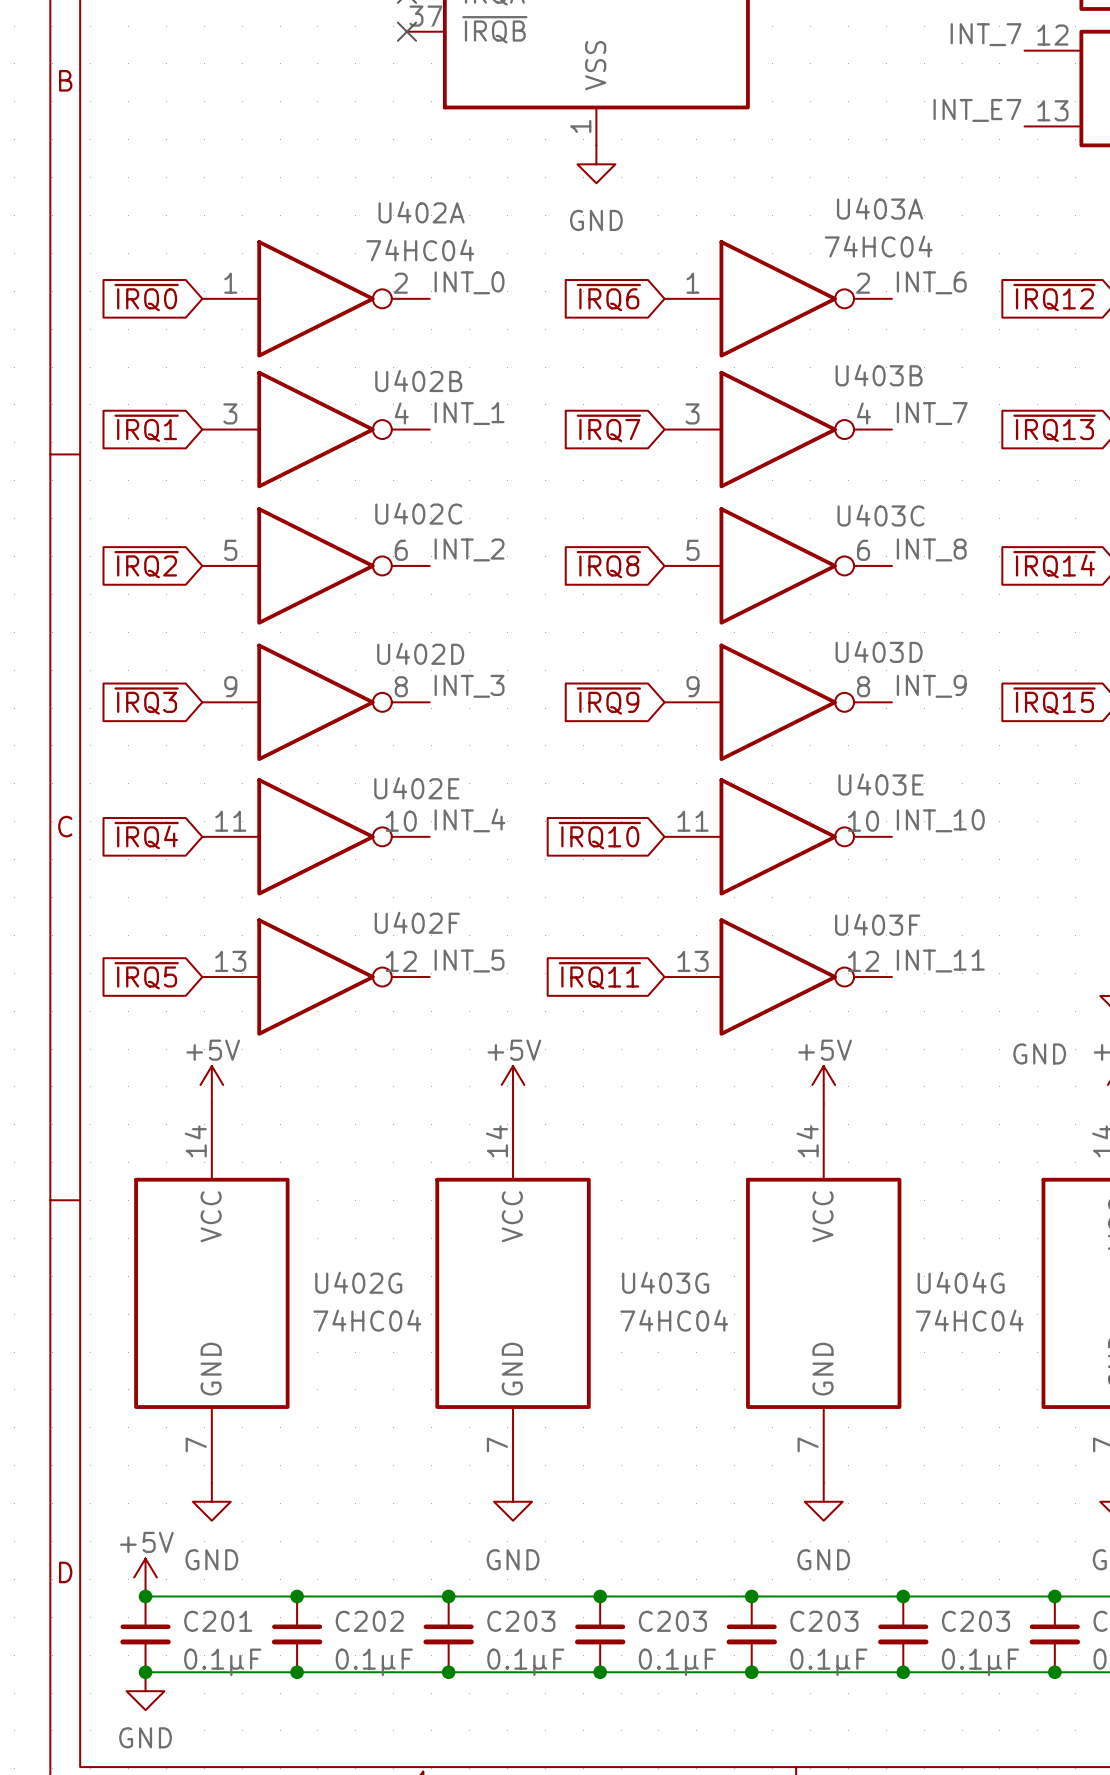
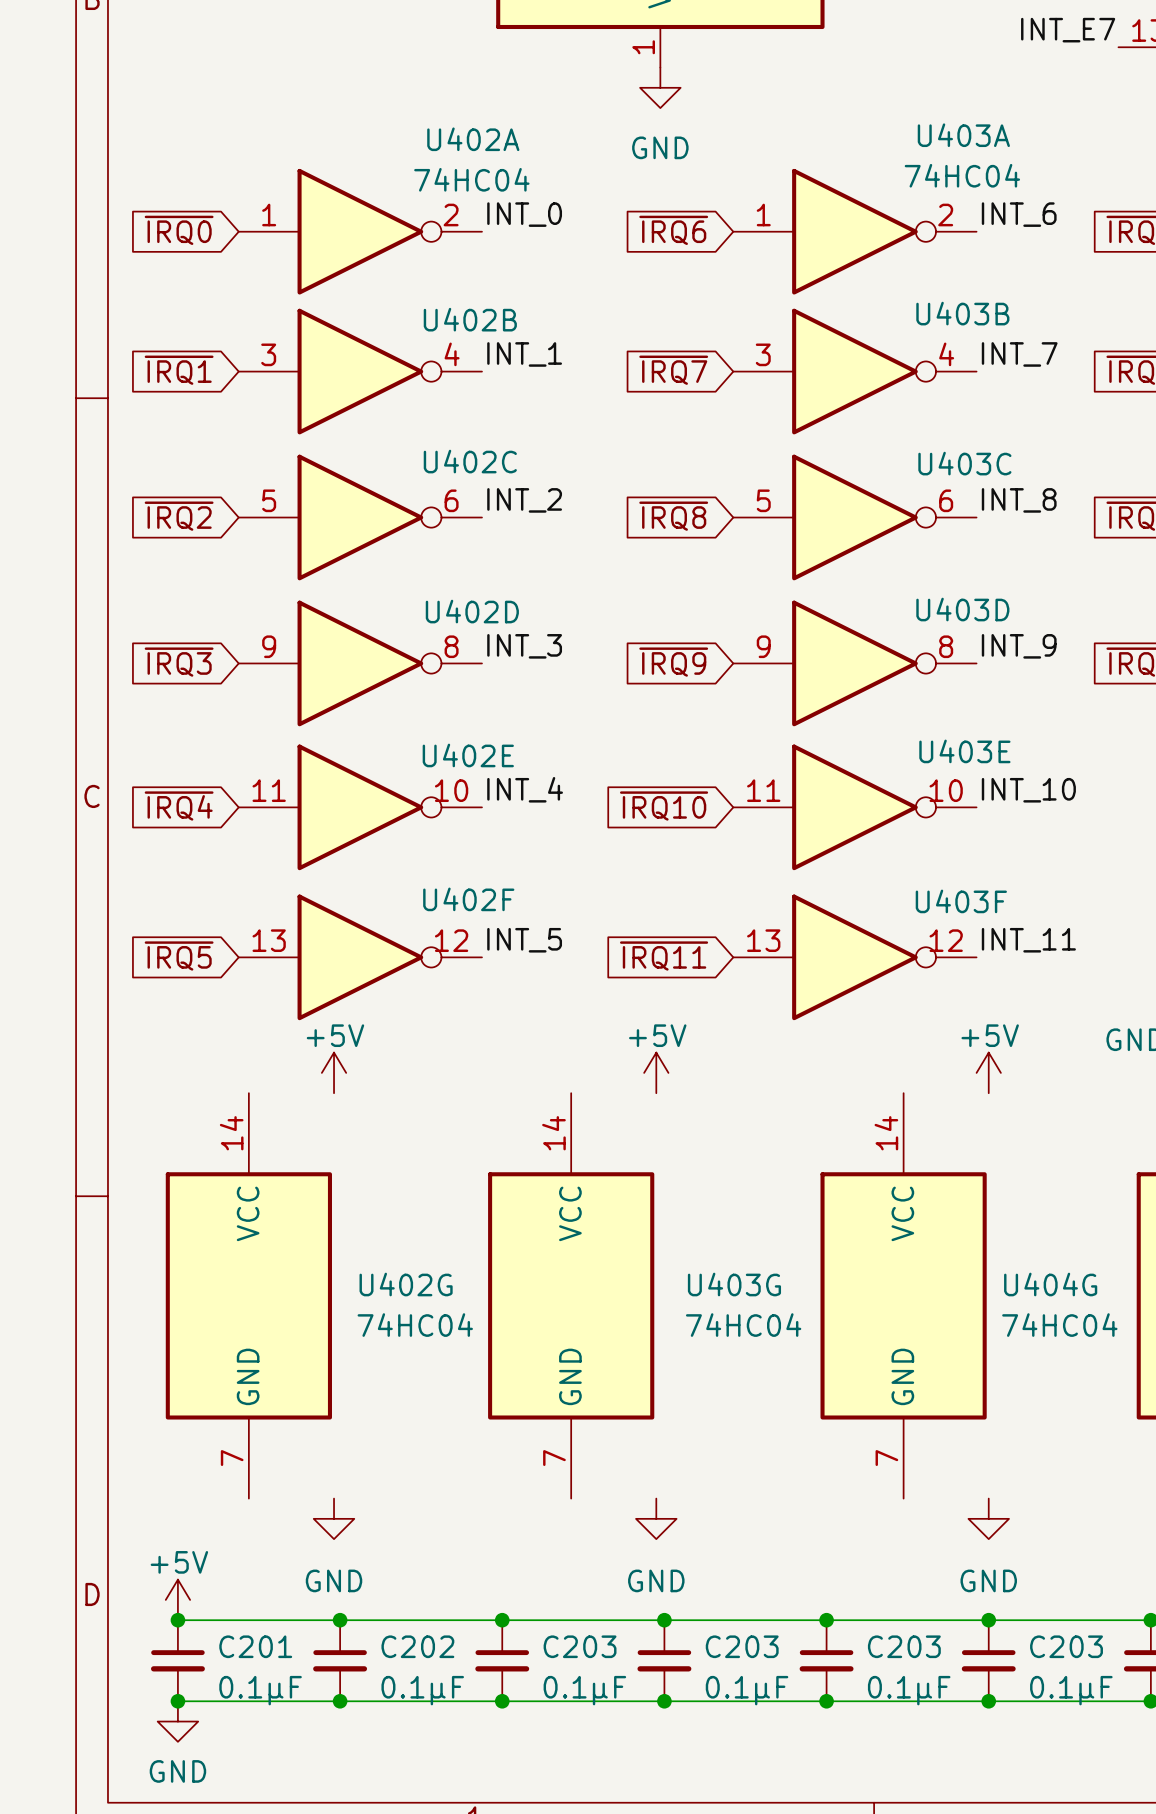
power symbol position: +5V (211, 1085) -> +5V (334, 1072)
power symbol position: +5V (513, 1085) -> +5V (656, 1072)
power symbol position: +5V (823, 1085) -> +5V (988, 1072)
power symbol position: GND (211, 1501) -> GND (334, 1518)
power symbol position: GND (513, 1501) -> GND (656, 1518)
power symbol position: GND (823, 1501) -> GND (988, 1518)

